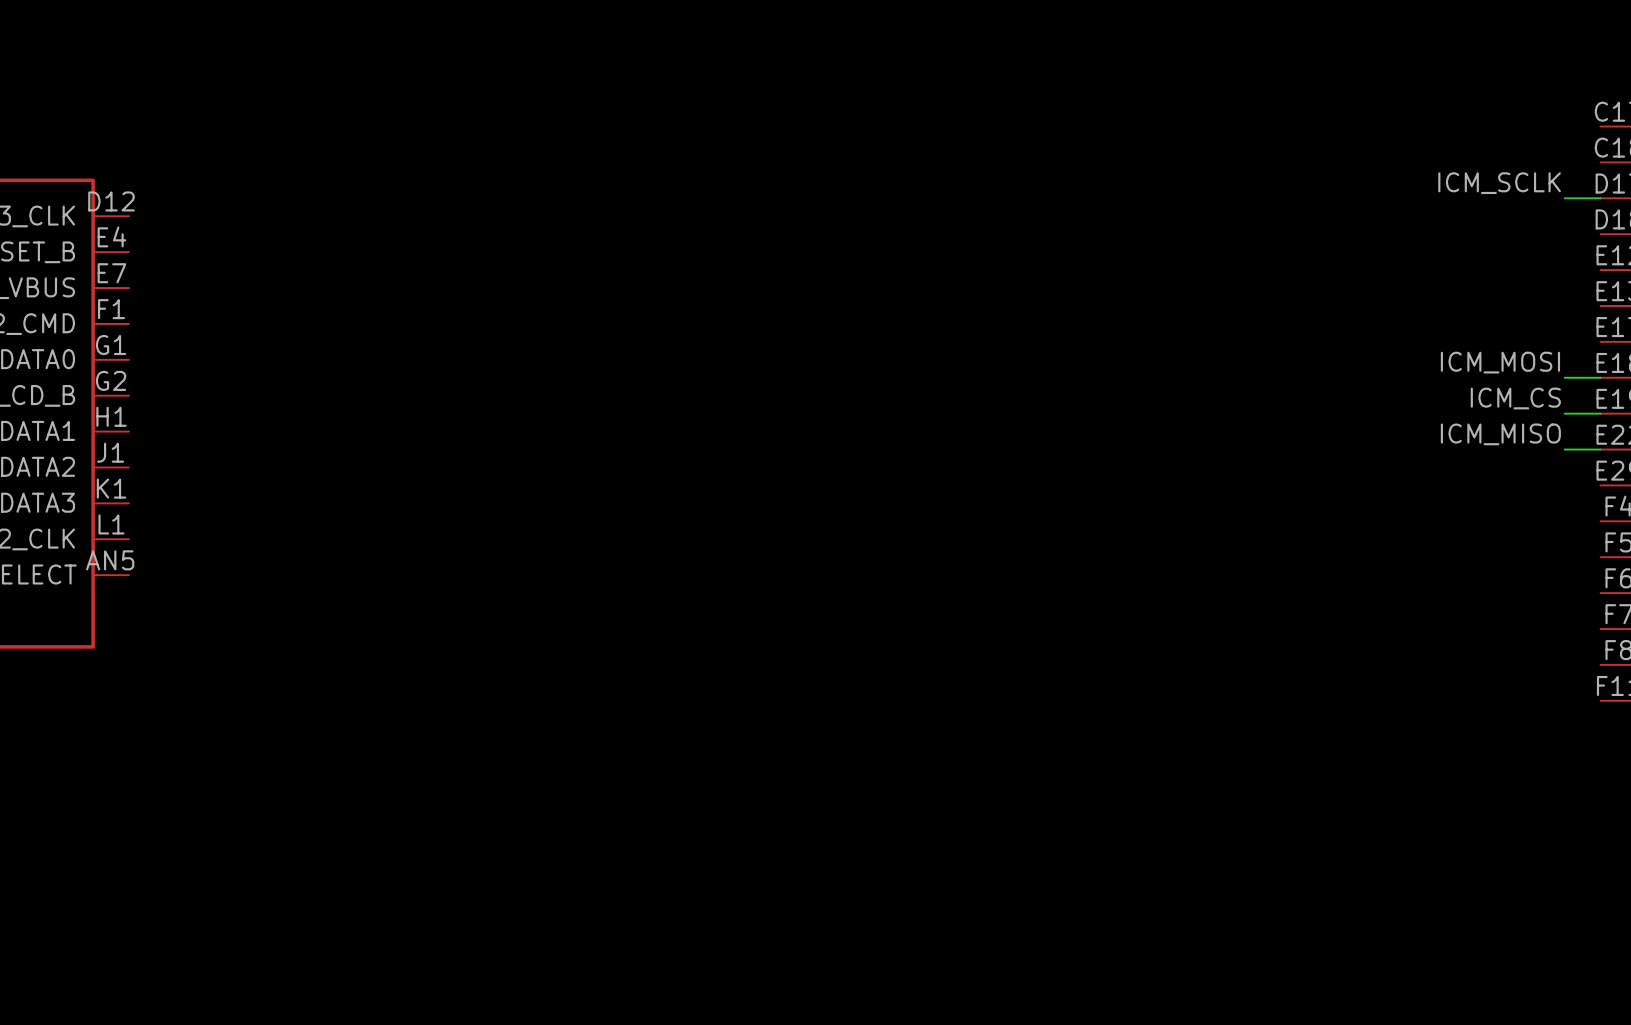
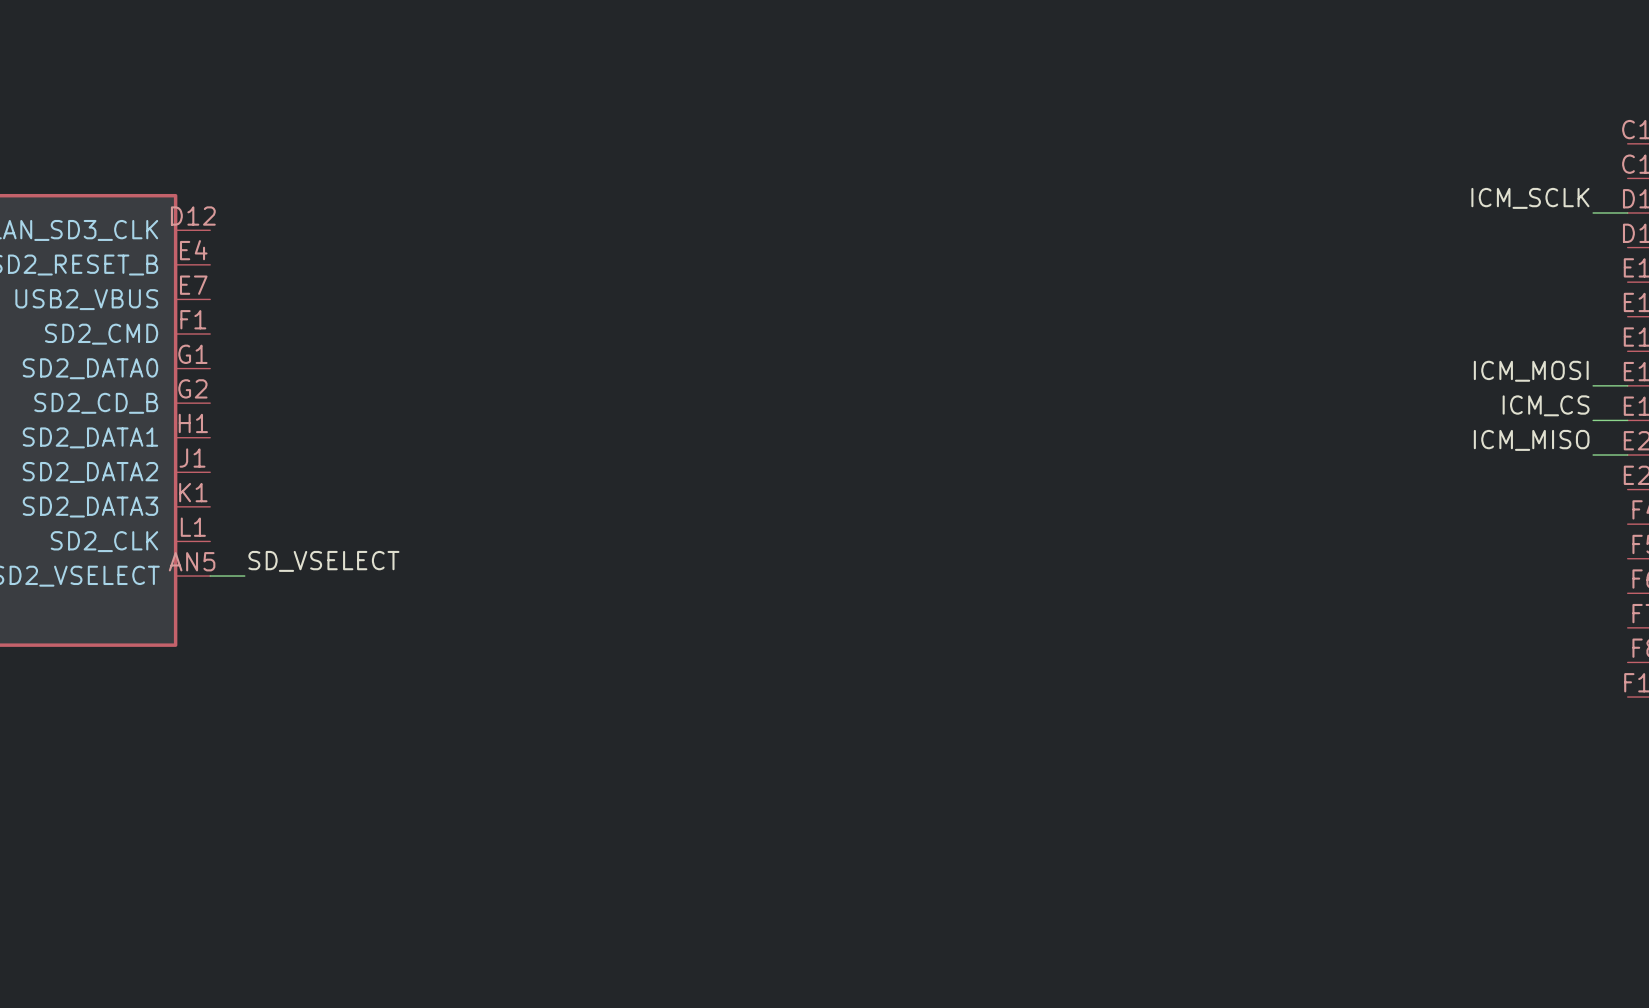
label: none -> SD_VSELECT (323, 561)
wire: none -> (210, 576) (244, 576)

